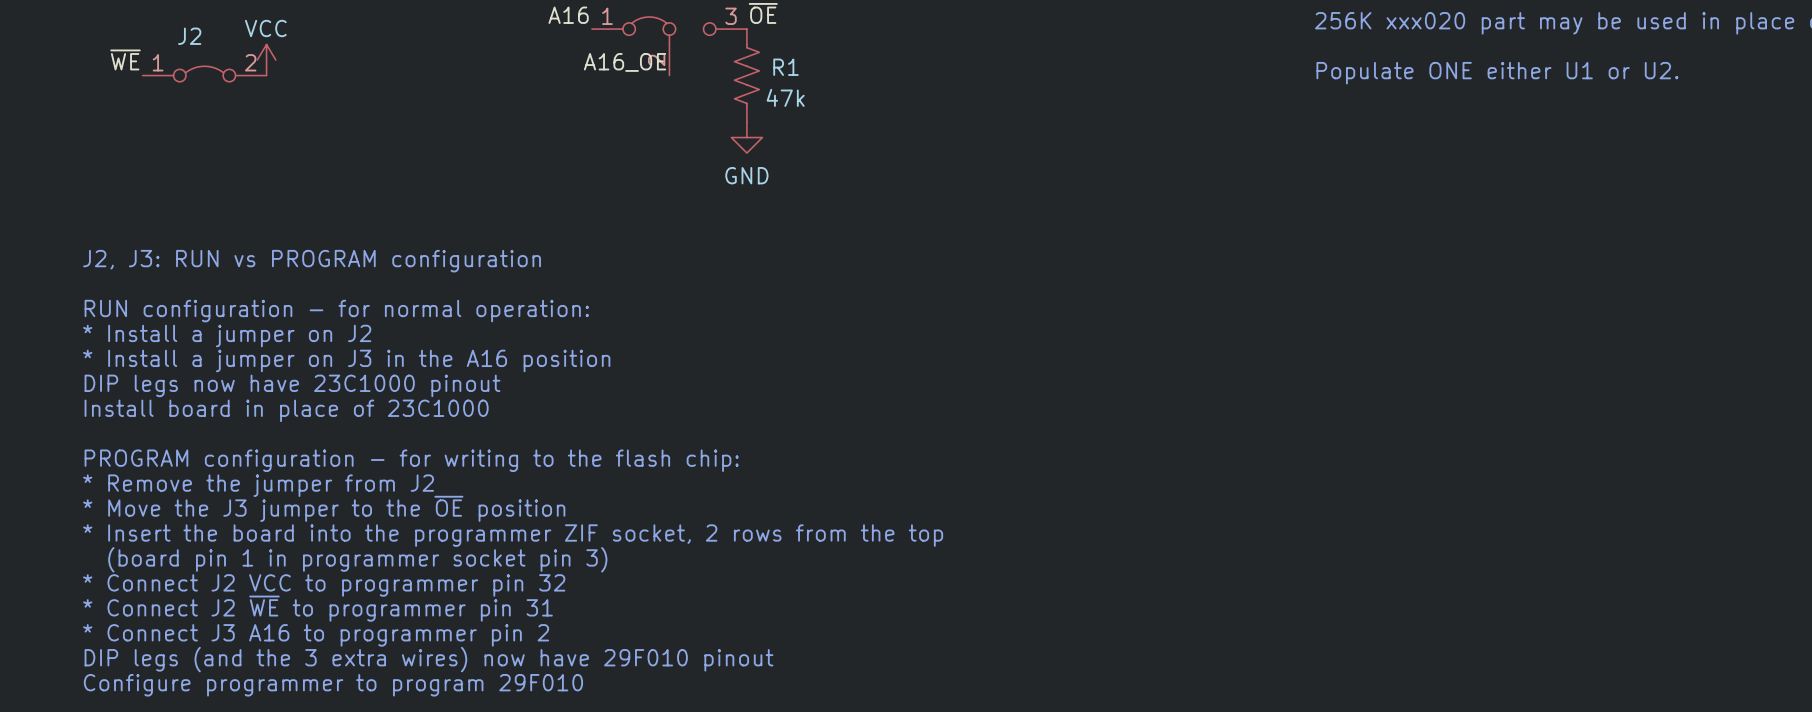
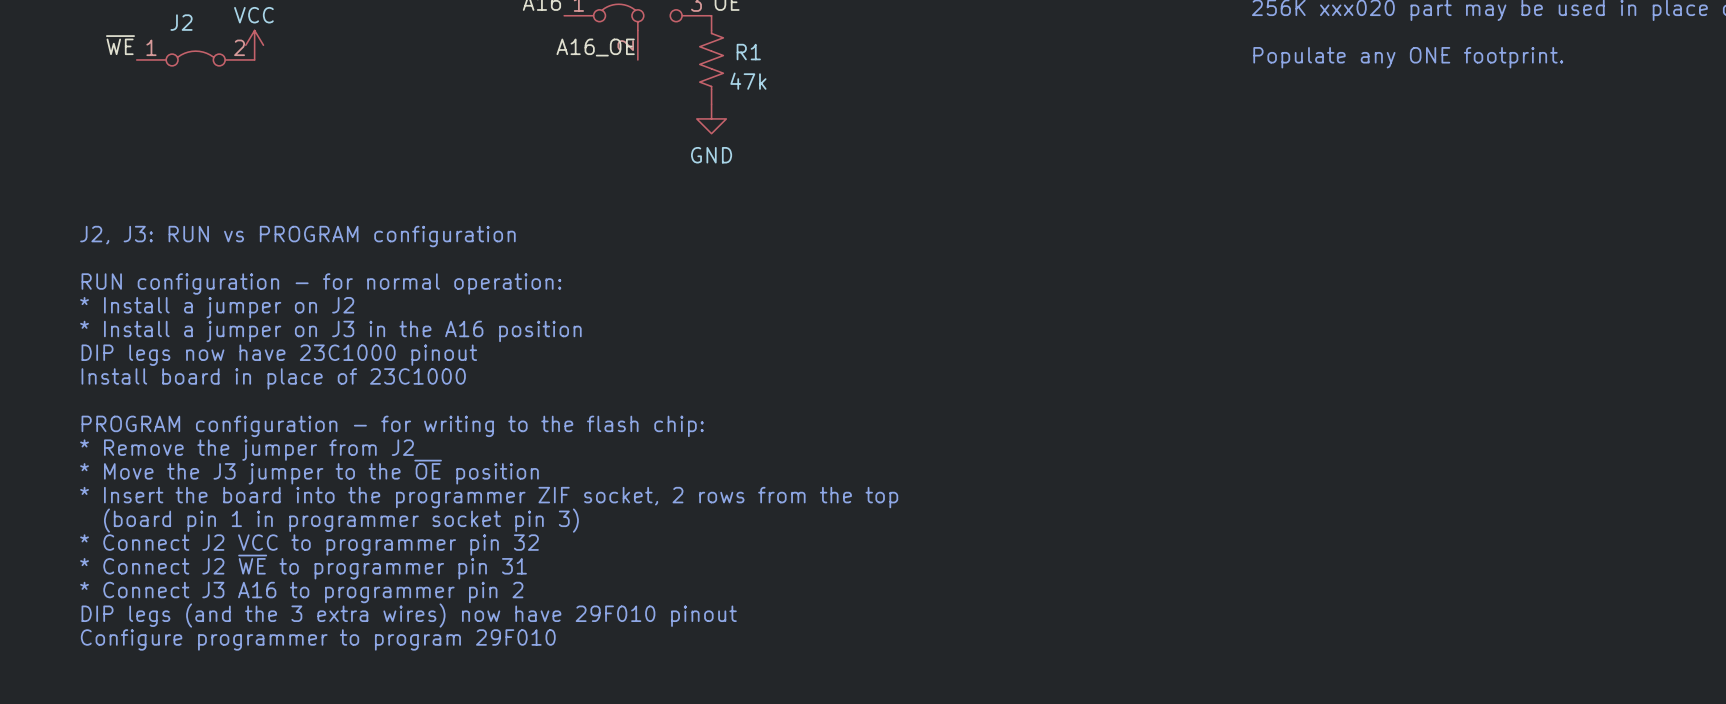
text: Populate ONE either U1 or U2. (1497, 73) -> Populate any ONE footprint. (1408, 57)

